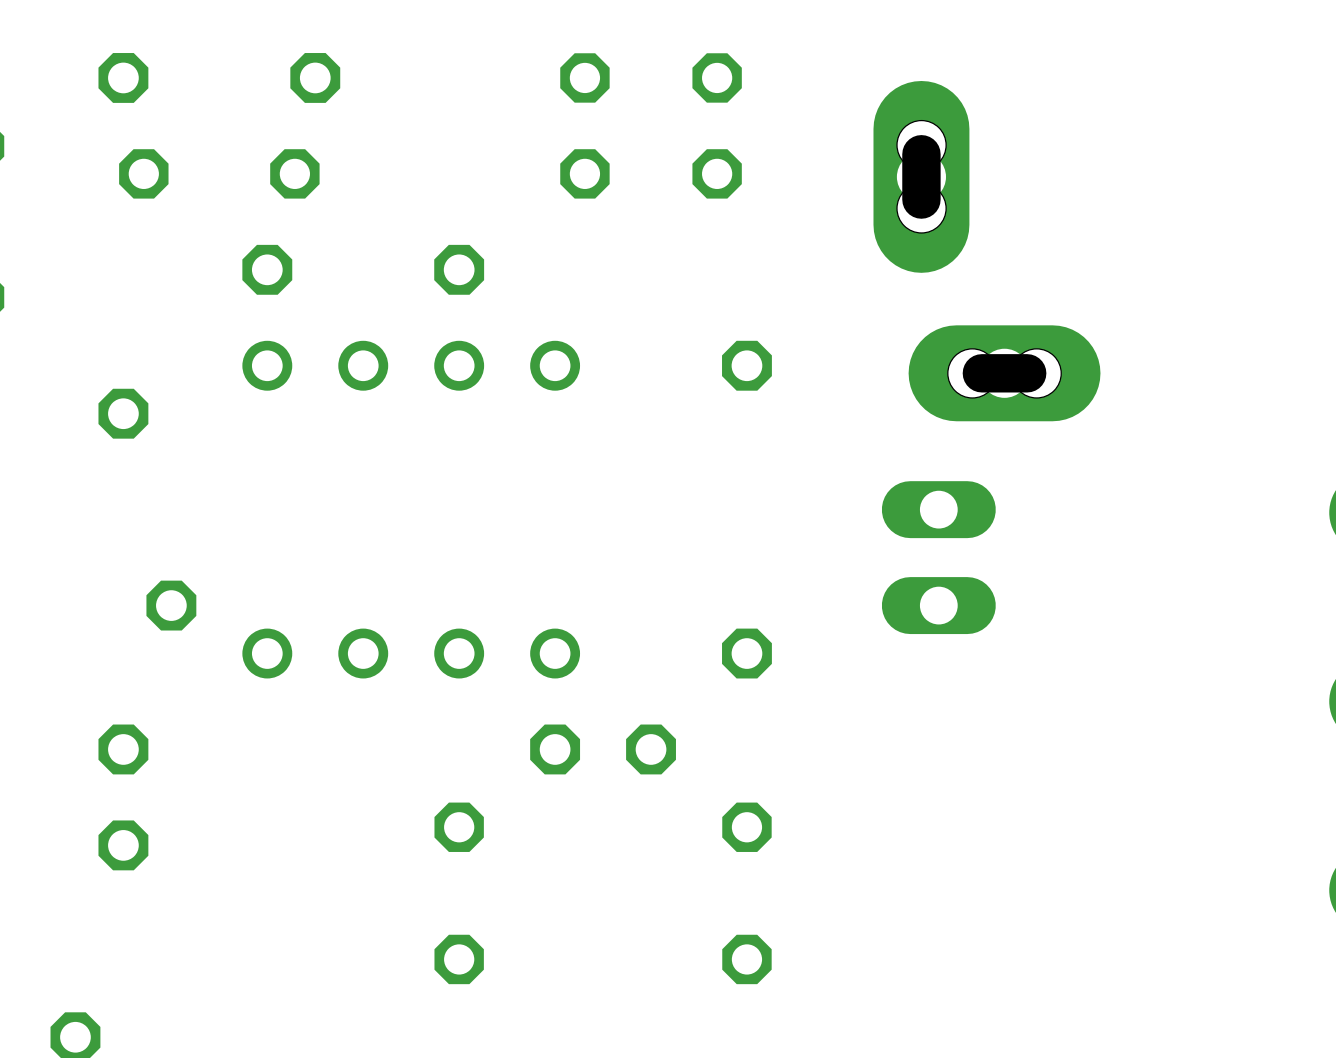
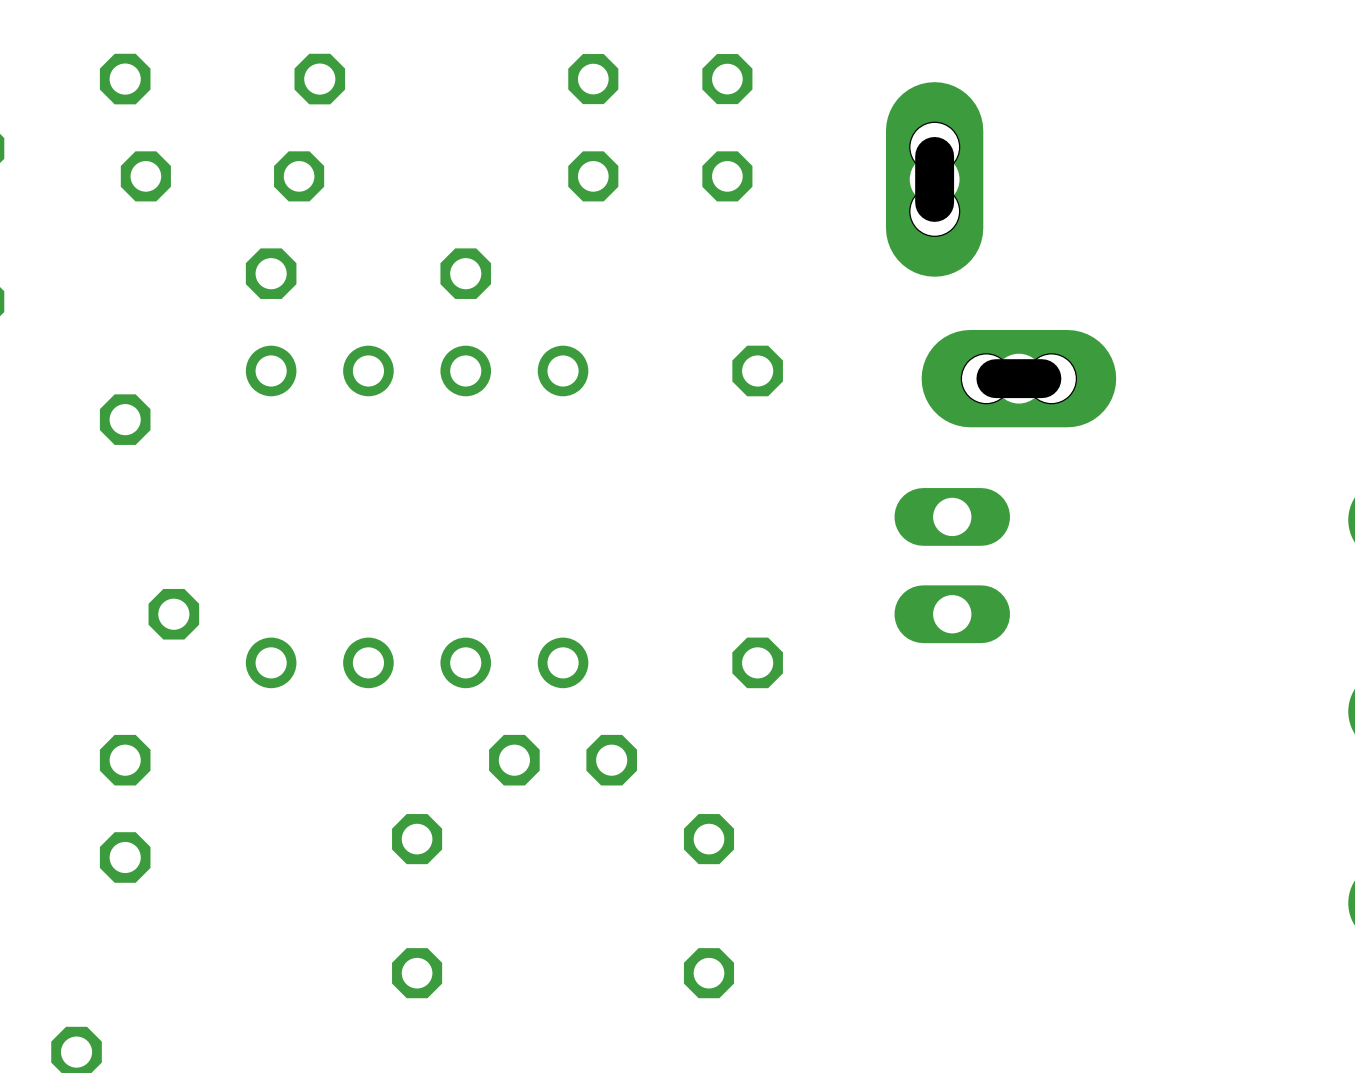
part position: (603, 749) -> (563, 760)
part position: (459, 893) -> (417, 906)
part position: (746, 893) -> (709, 906)

